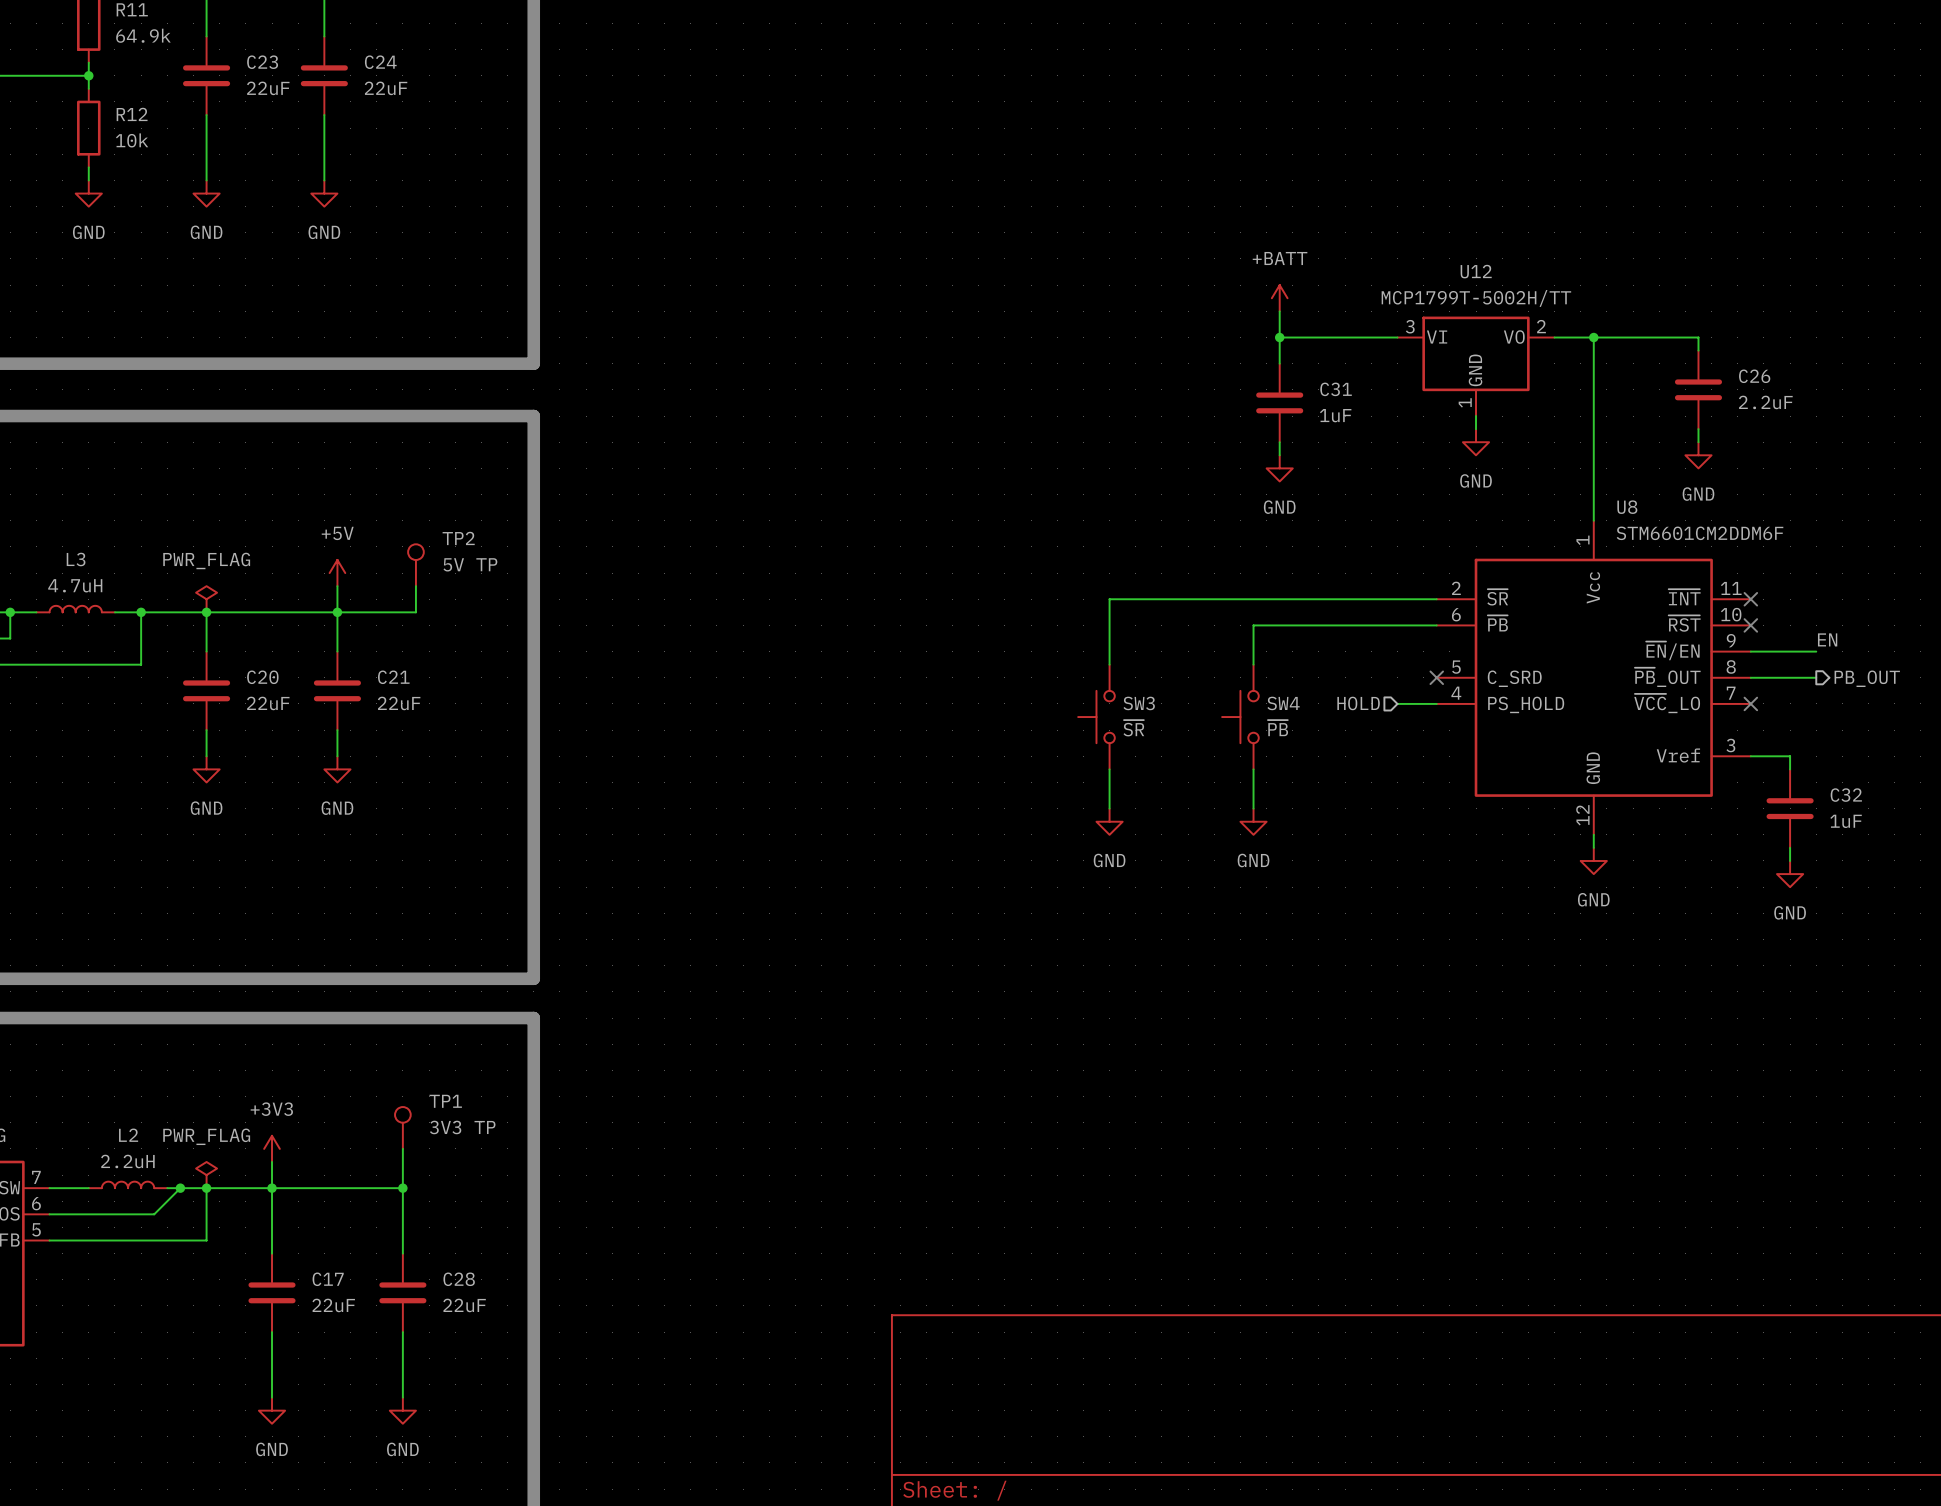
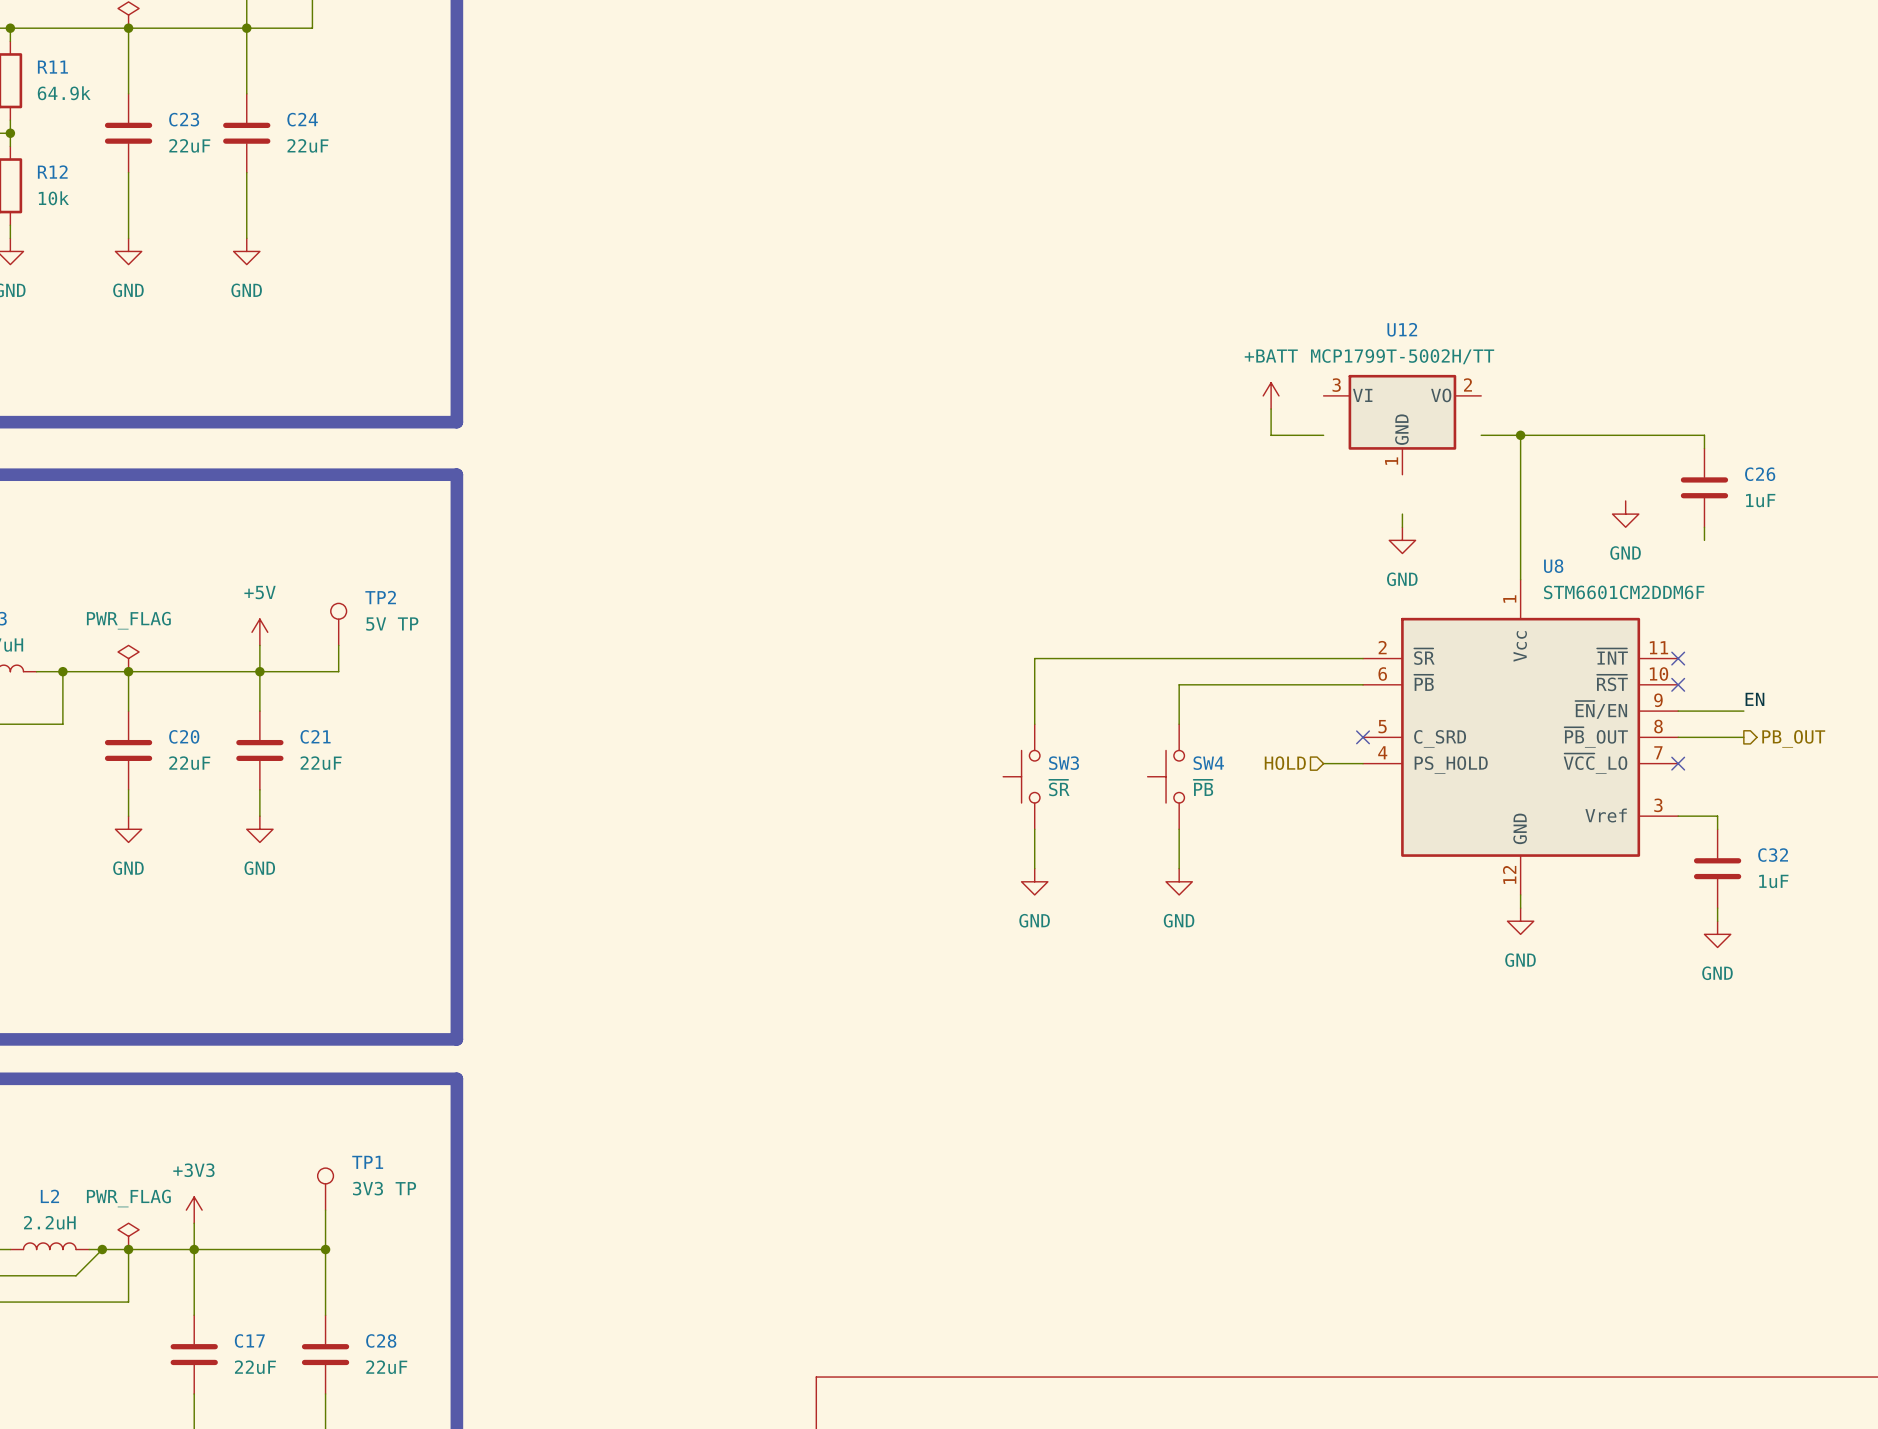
power symbol position: +BATT (1279, 298) -> +BATT (1271, 395)
wire: (1279, 311) (1279, 363) -> none
wire: (1279, 337) (1397, 337) -> none
junction: (1279, 337) -> none
wire: (1554, 337) (1698, 337) (1698, 350) -> none
wire: (1593, 337) (1593, 376) -> none
junction position: (1593, 337) -> (1520, 435)
wire: none -> (1271, 409) (1271, 435) (1323, 435)
wire: none -> (1481, 435) (1704, 435) (1704, 448)
C26 position: (1698, 389) -> (1704, 487)
C31: 1uF (1279, 402) -> none
C26 value: 2.2uF (1765, 402) -> 1uF (1760, 500)
wire: (1476, 416) (1476, 429) -> (1402, 514) (1402, 527)
wire: (1698, 429) (1698, 442) -> (1704, 527) (1704, 540)
wire: (1279, 442) (1279, 455) -> none
power symbol position: GND (1476, 442) -> GND (1402, 540)
power symbol: GND (1279, 468) -> none

